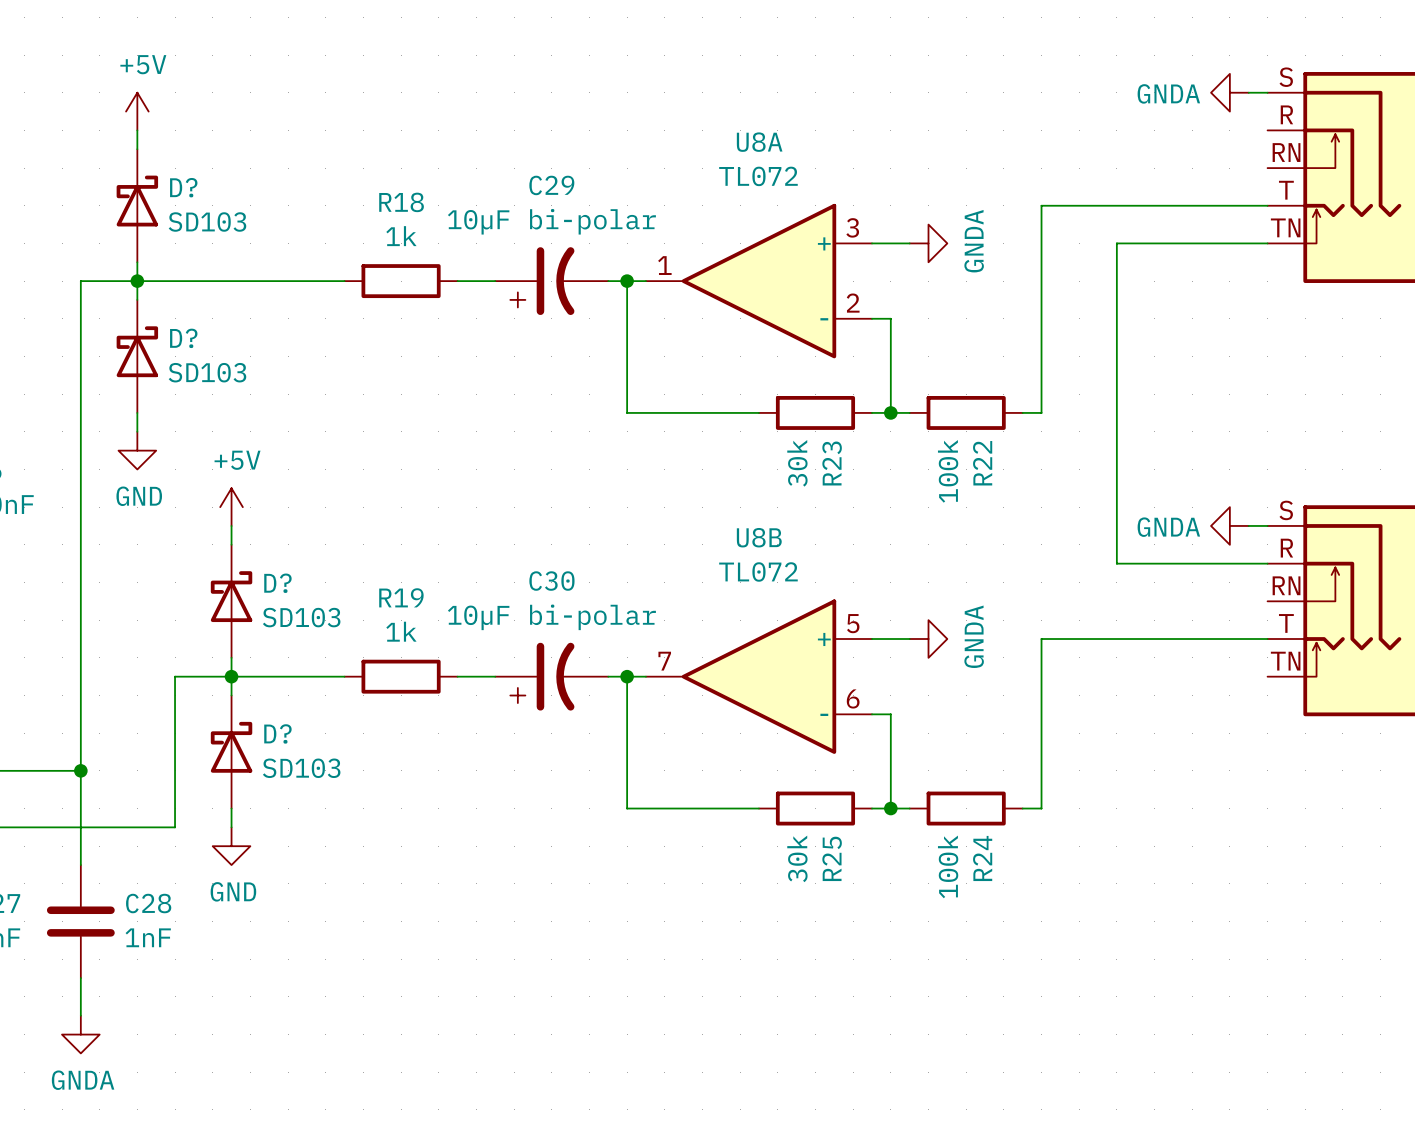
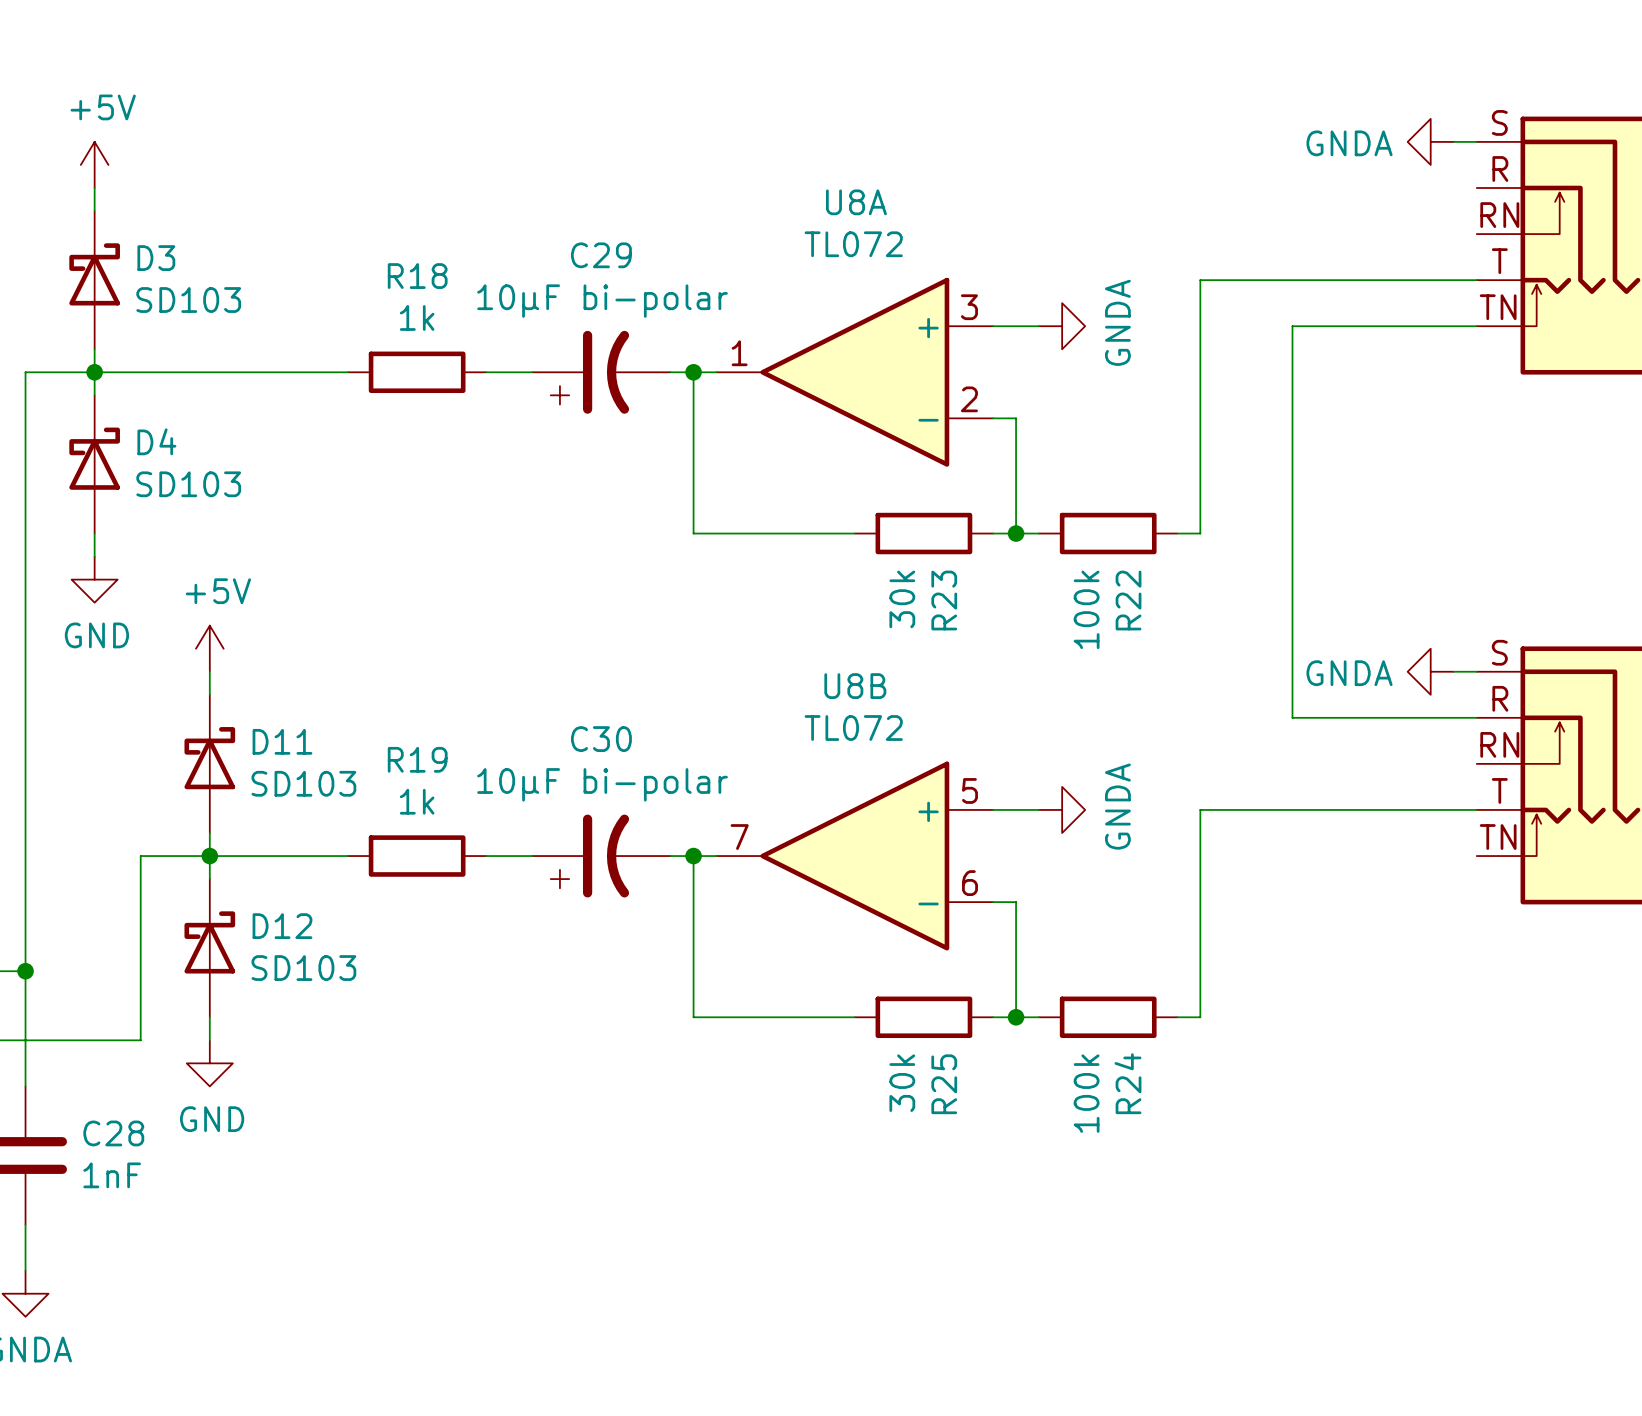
D? name: D? (183, 187) -> D3 (156, 258)
D? name: D? (183, 338) -> D4 (156, 441)
D? name: D? (277, 583) -> D11 (282, 741)
D? name: D? (277, 733) -> D12 (282, 926)

